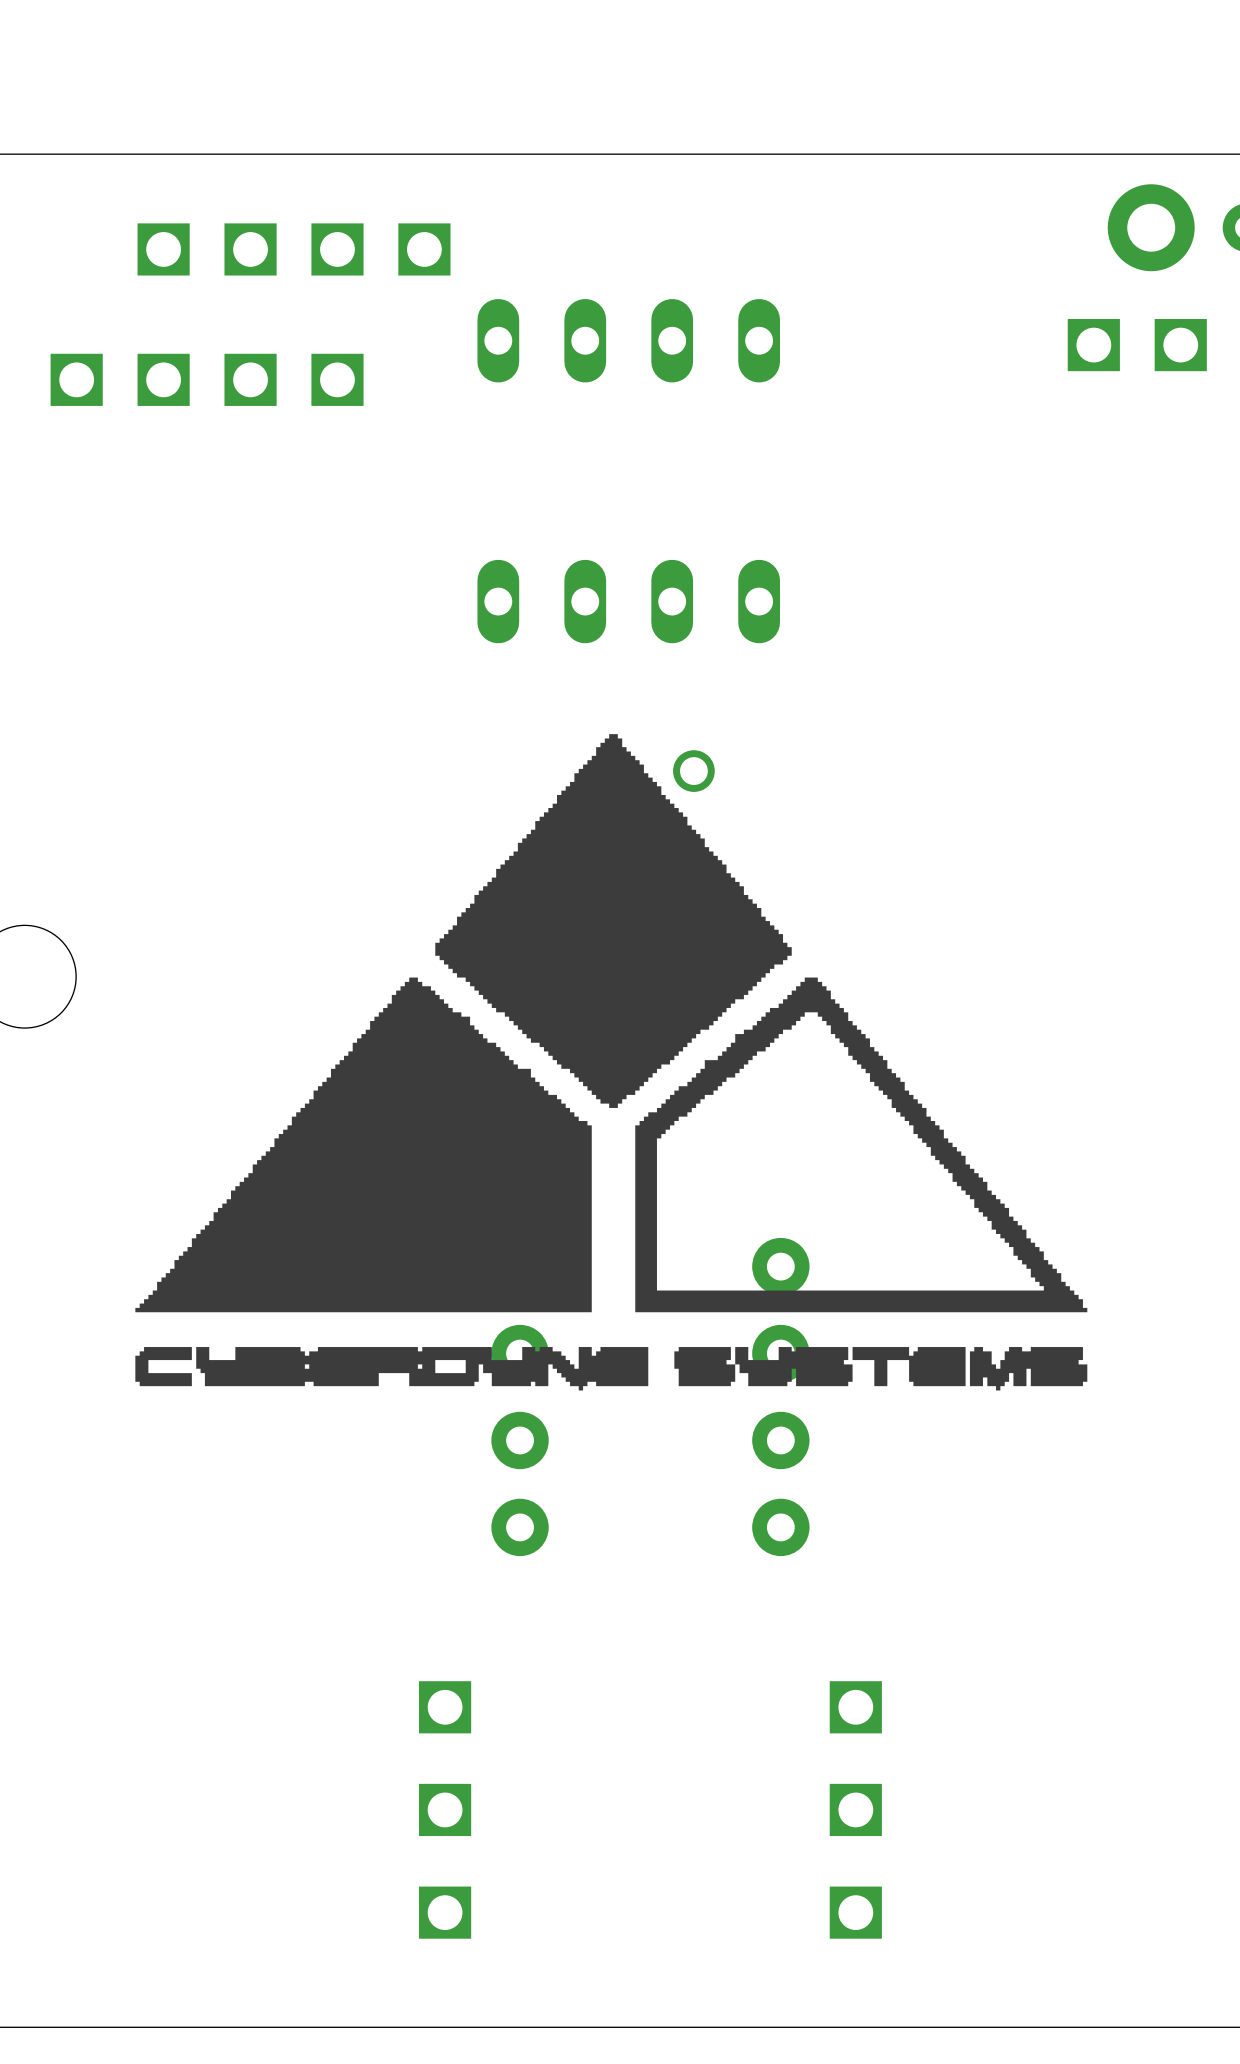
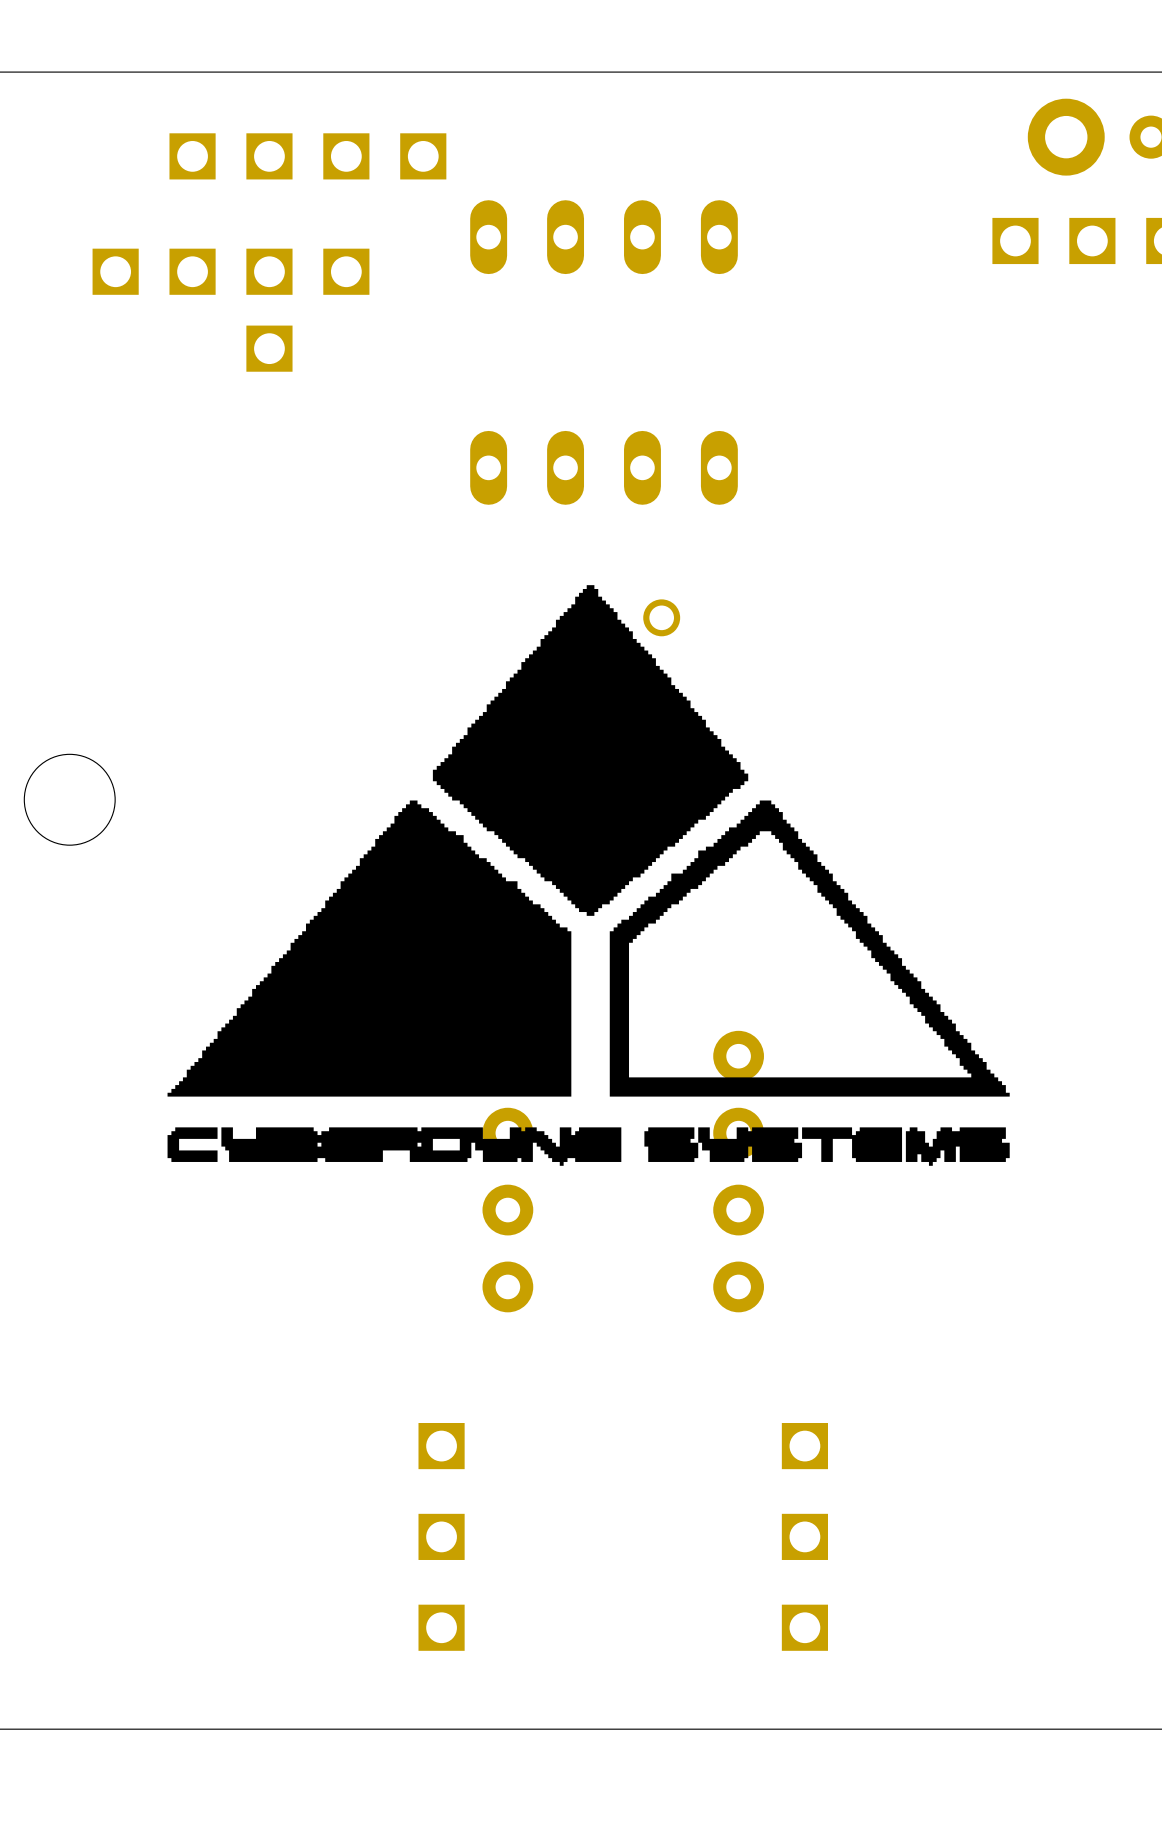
part: none -> (231, 310)

